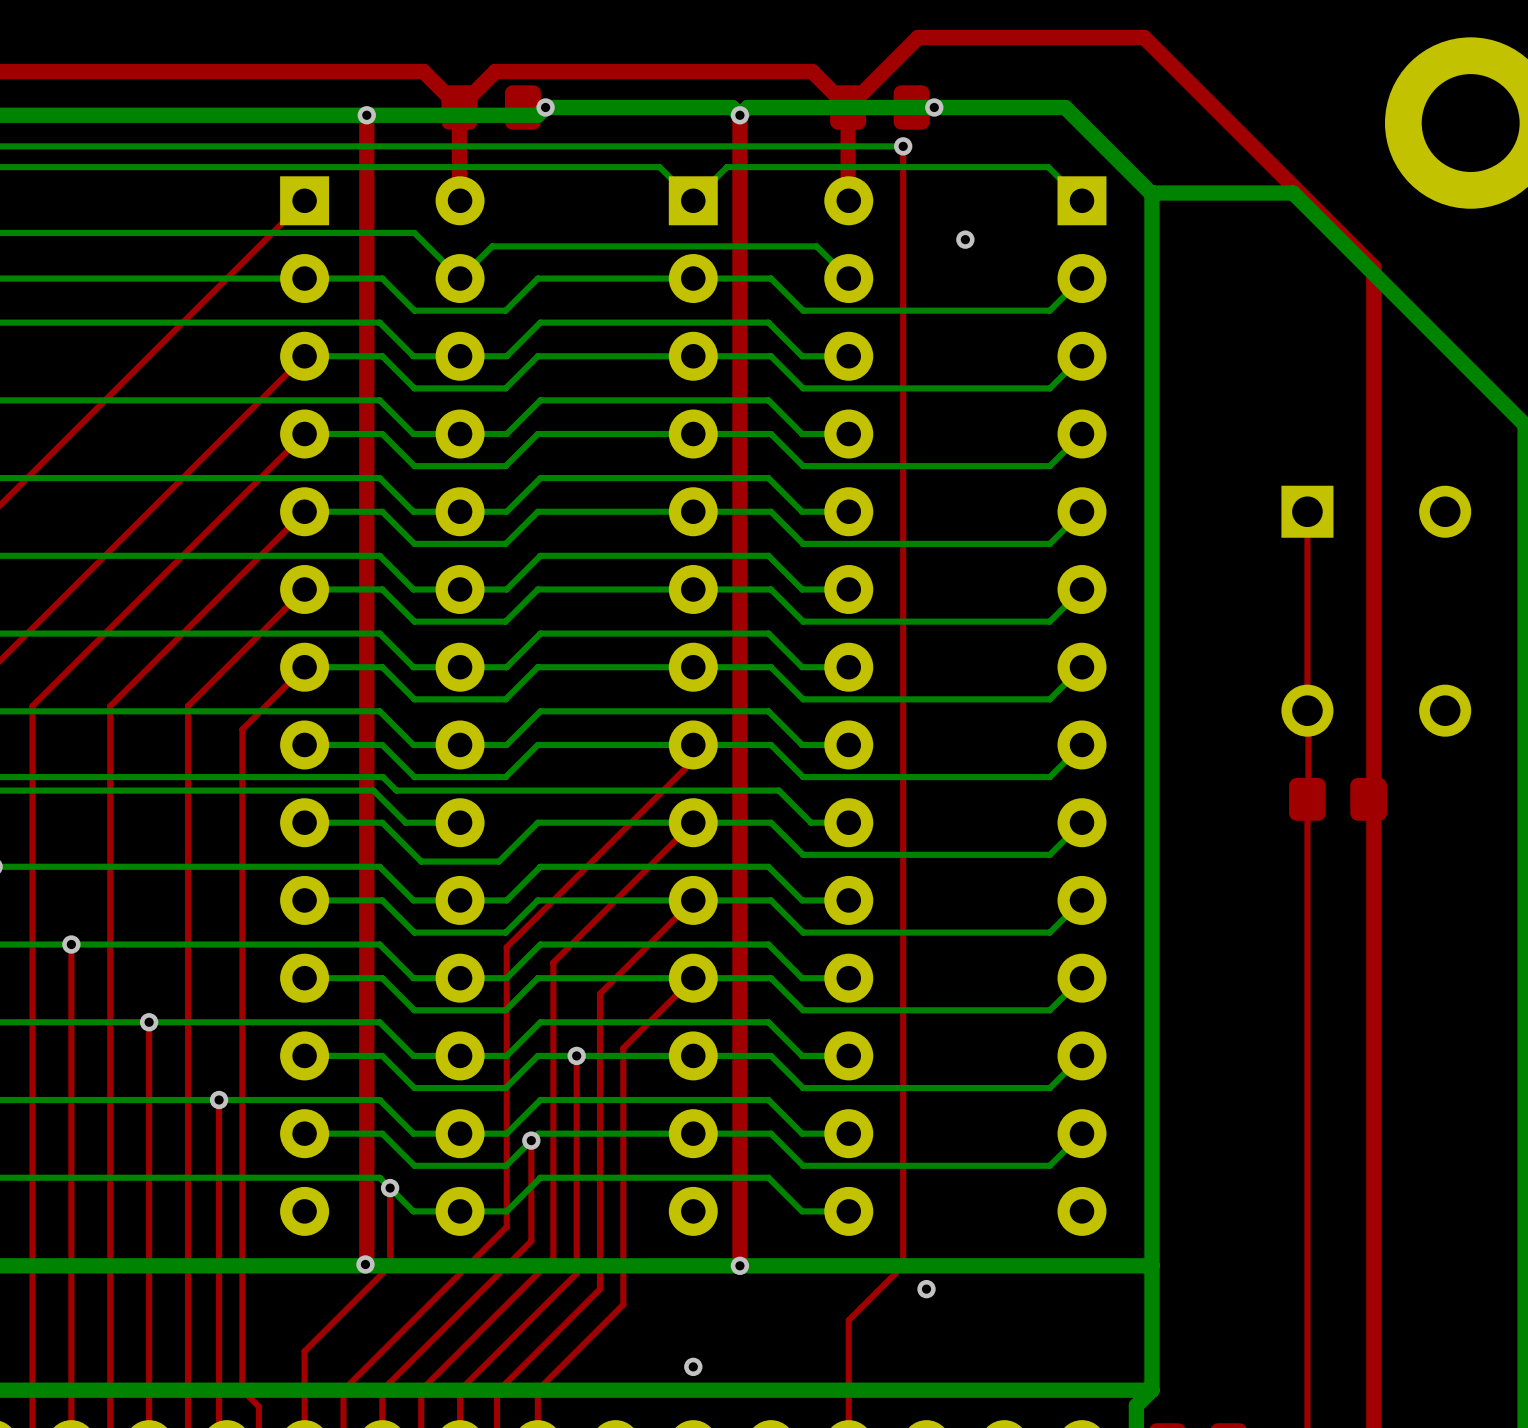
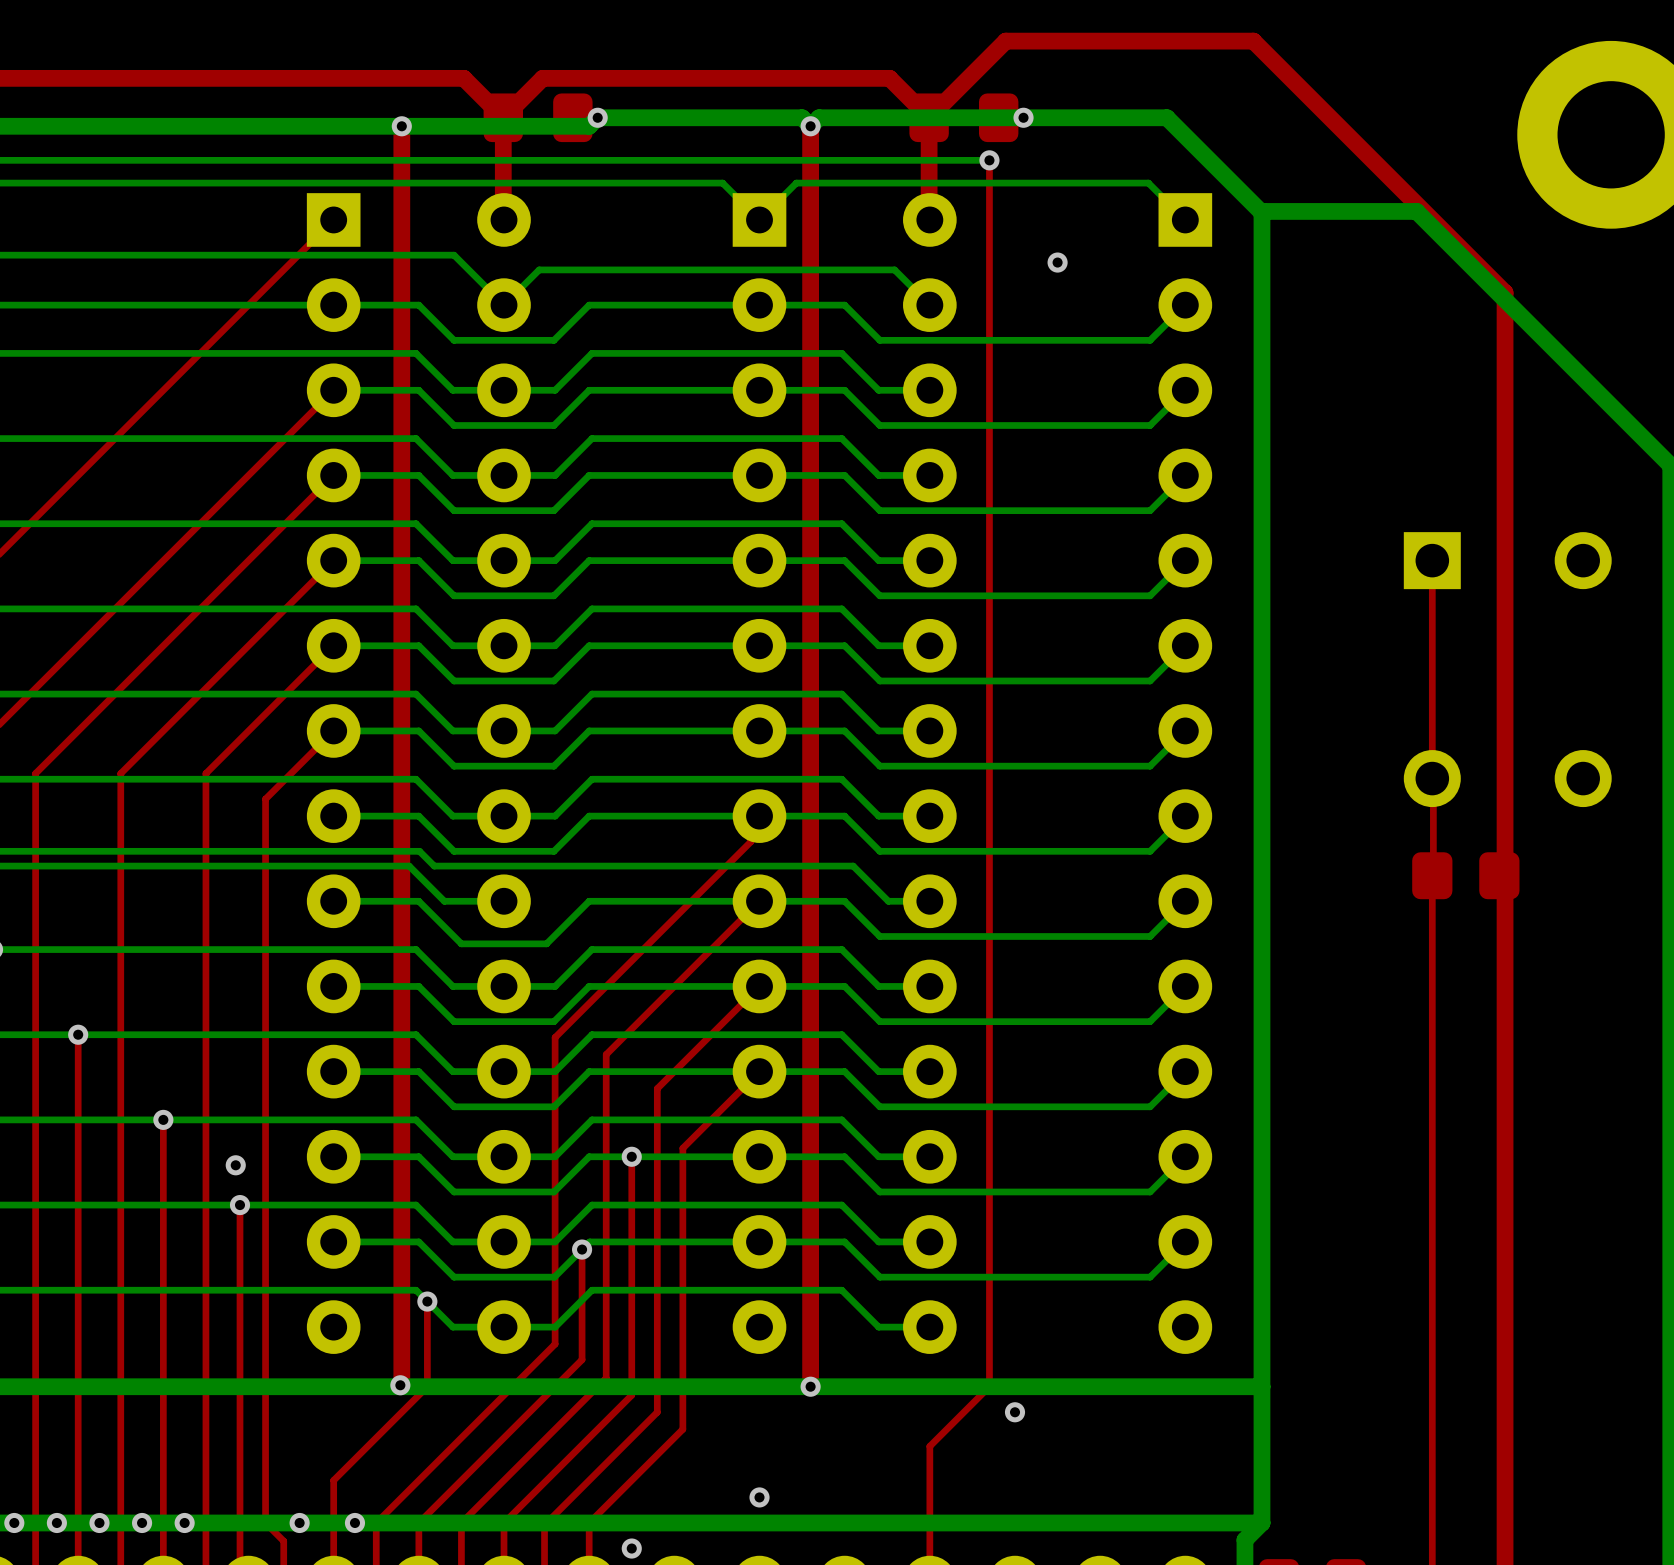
via: none -> (235, 1165)
via: none -> (14, 1522)
via: none -> (56, 1522)
via: none -> (99, 1522)
via: none -> (142, 1522)
via: none -> (184, 1522)
via: none -> (299, 1522)
via: none -> (354, 1522)
via: none -> (631, 1548)

